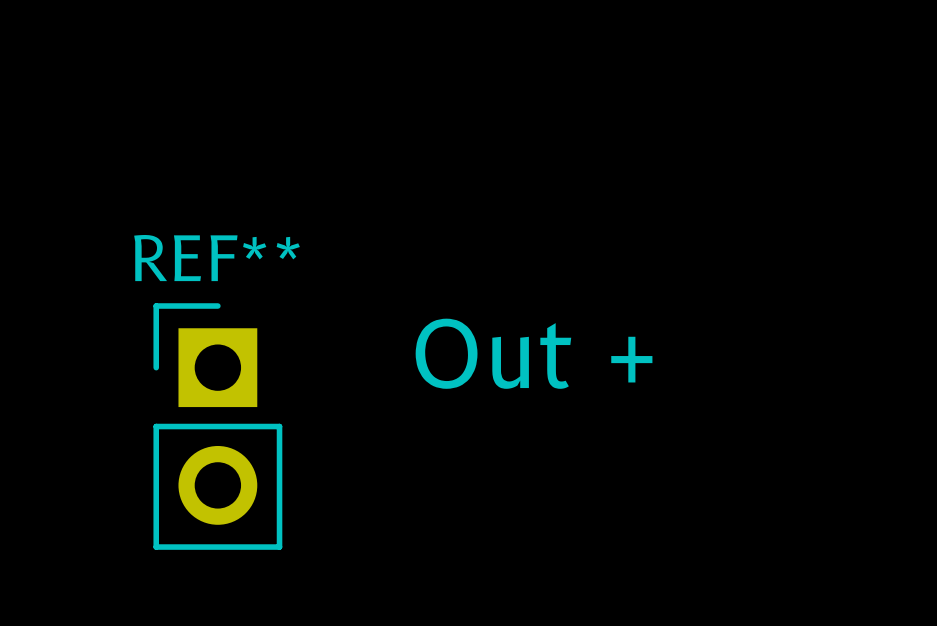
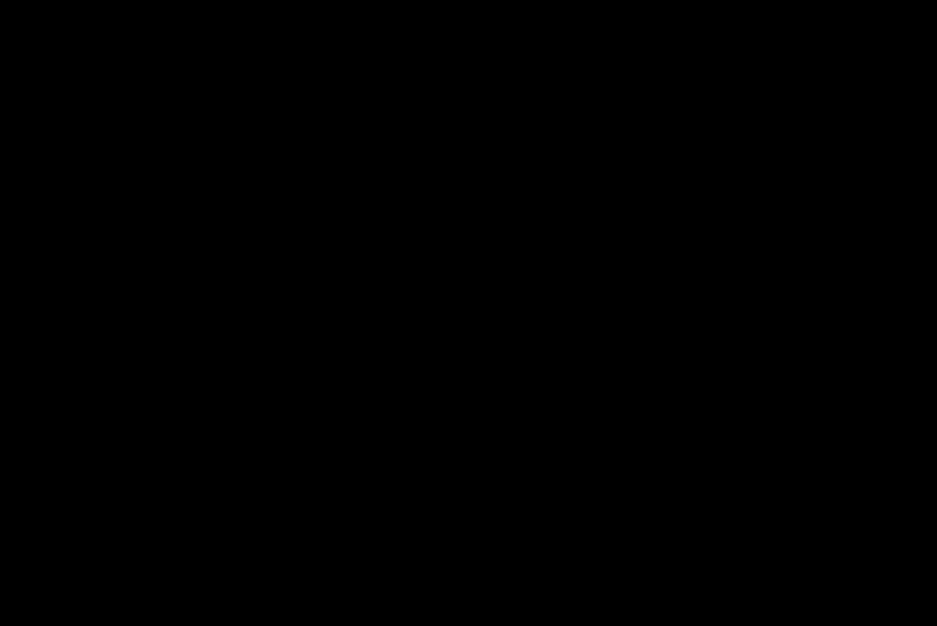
text: Out + (534, 353) -> none
REF**: (217, 426) -> none

